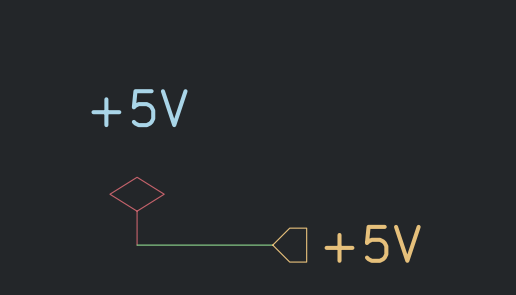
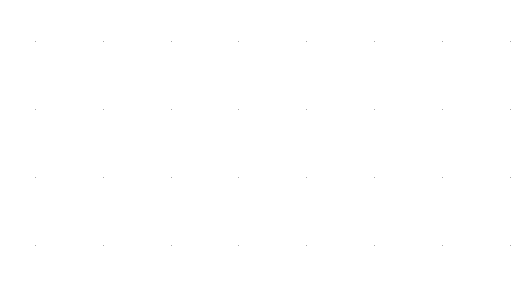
power symbol: +5V (137, 211) -> none
hierarchical label: +5V (372, 243) -> none
wire: (137, 245) (272, 245) -> none

